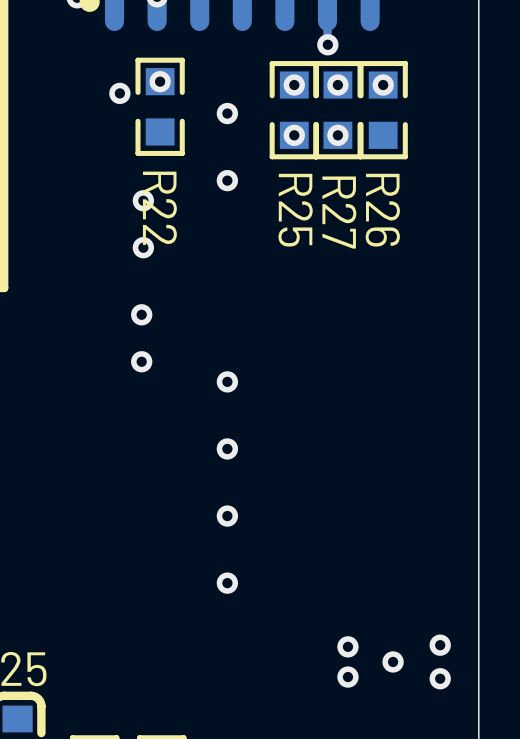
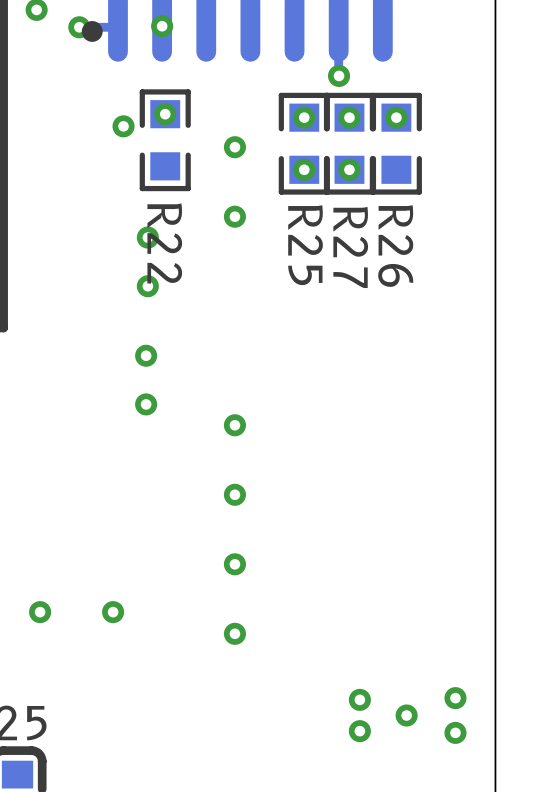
via: none -> (40, 612)
via: none -> (113, 612)

